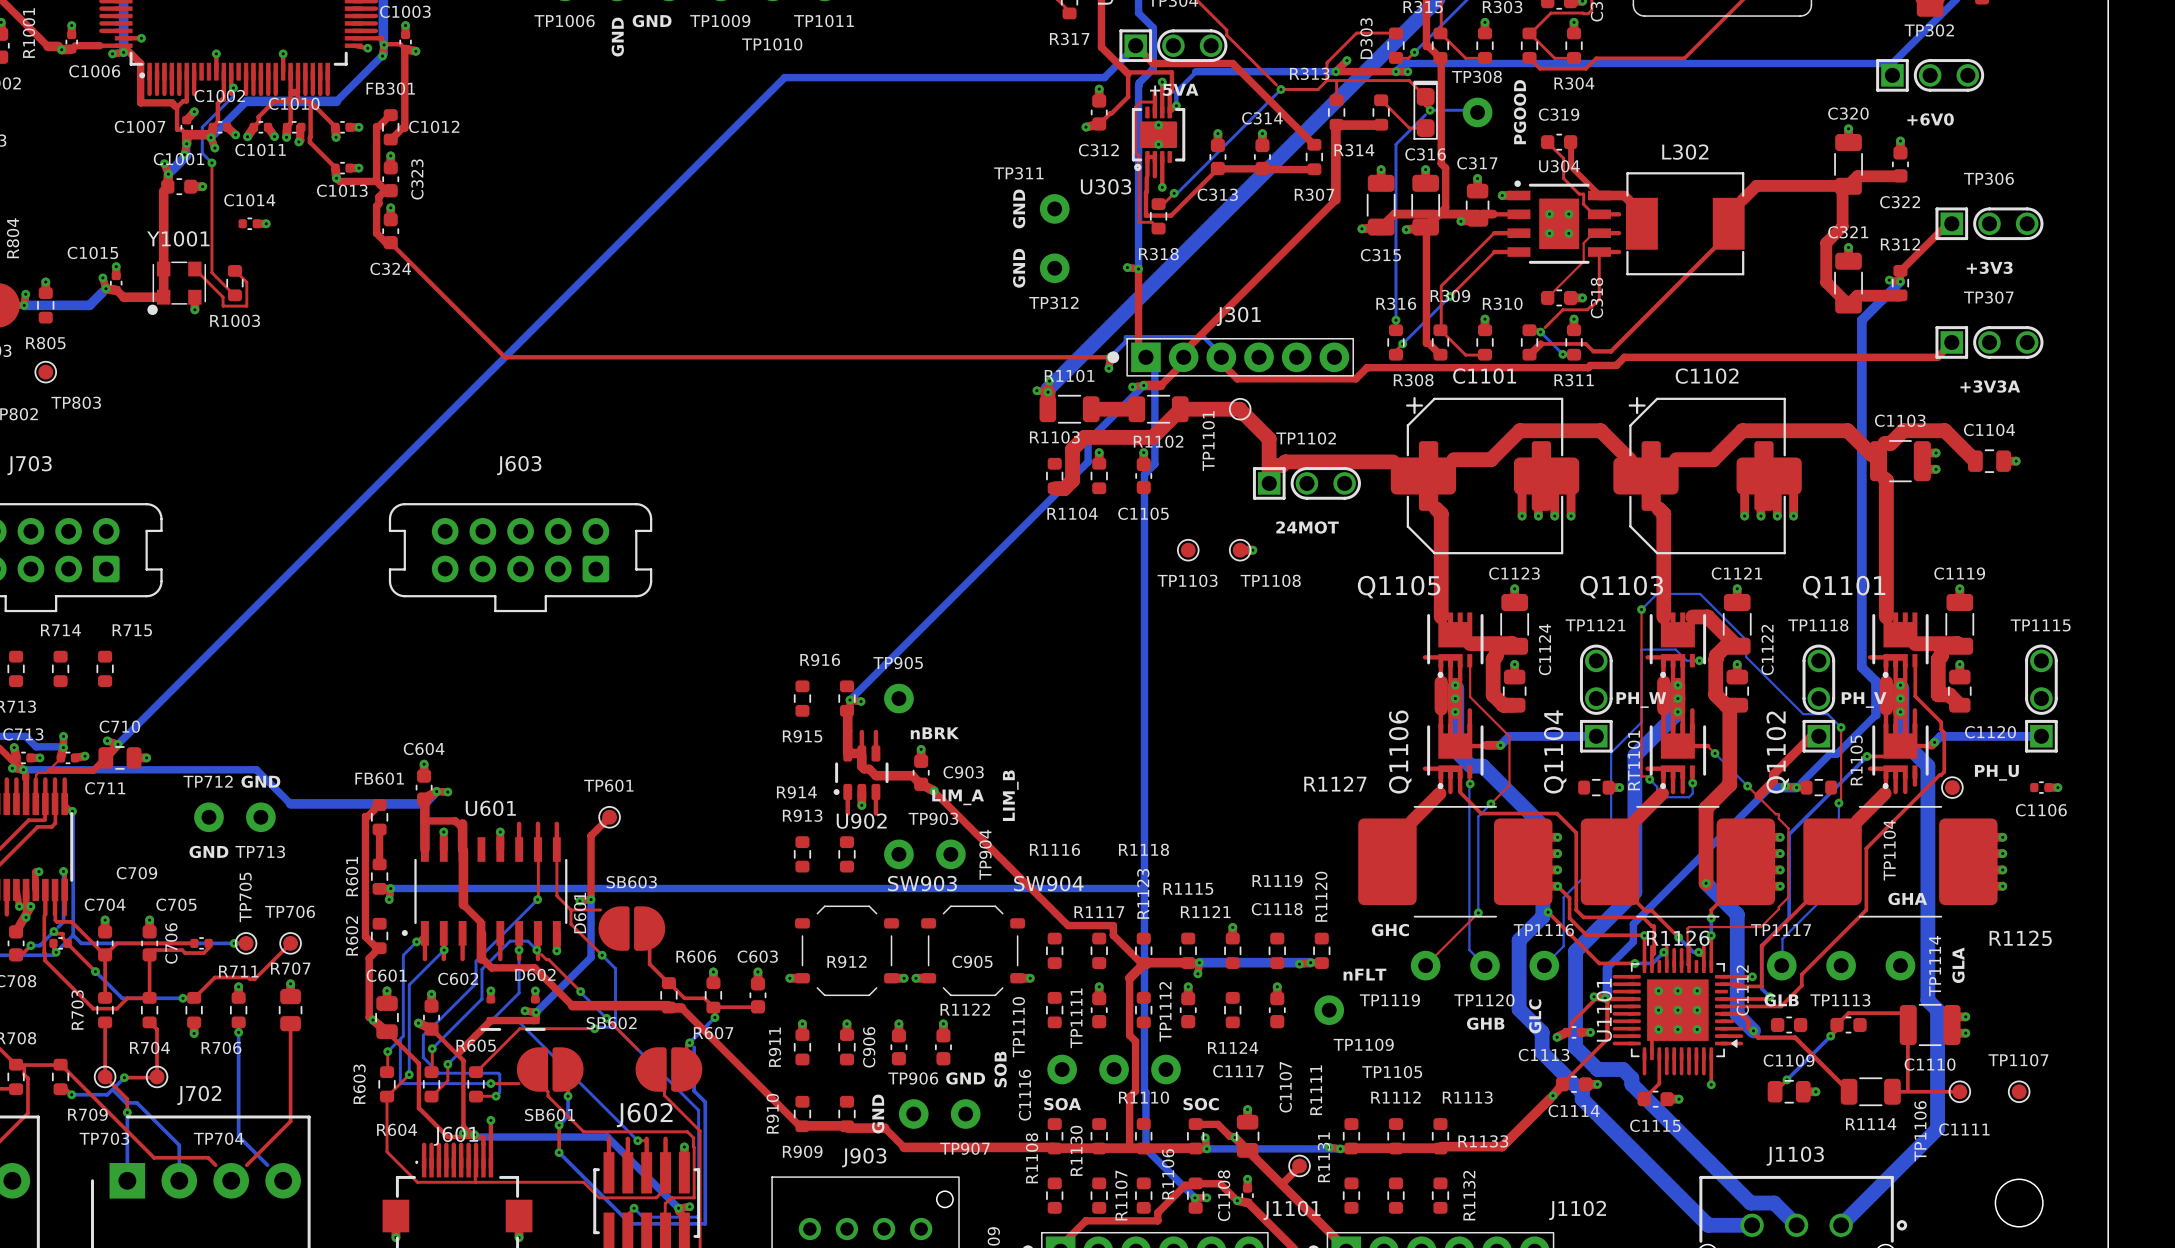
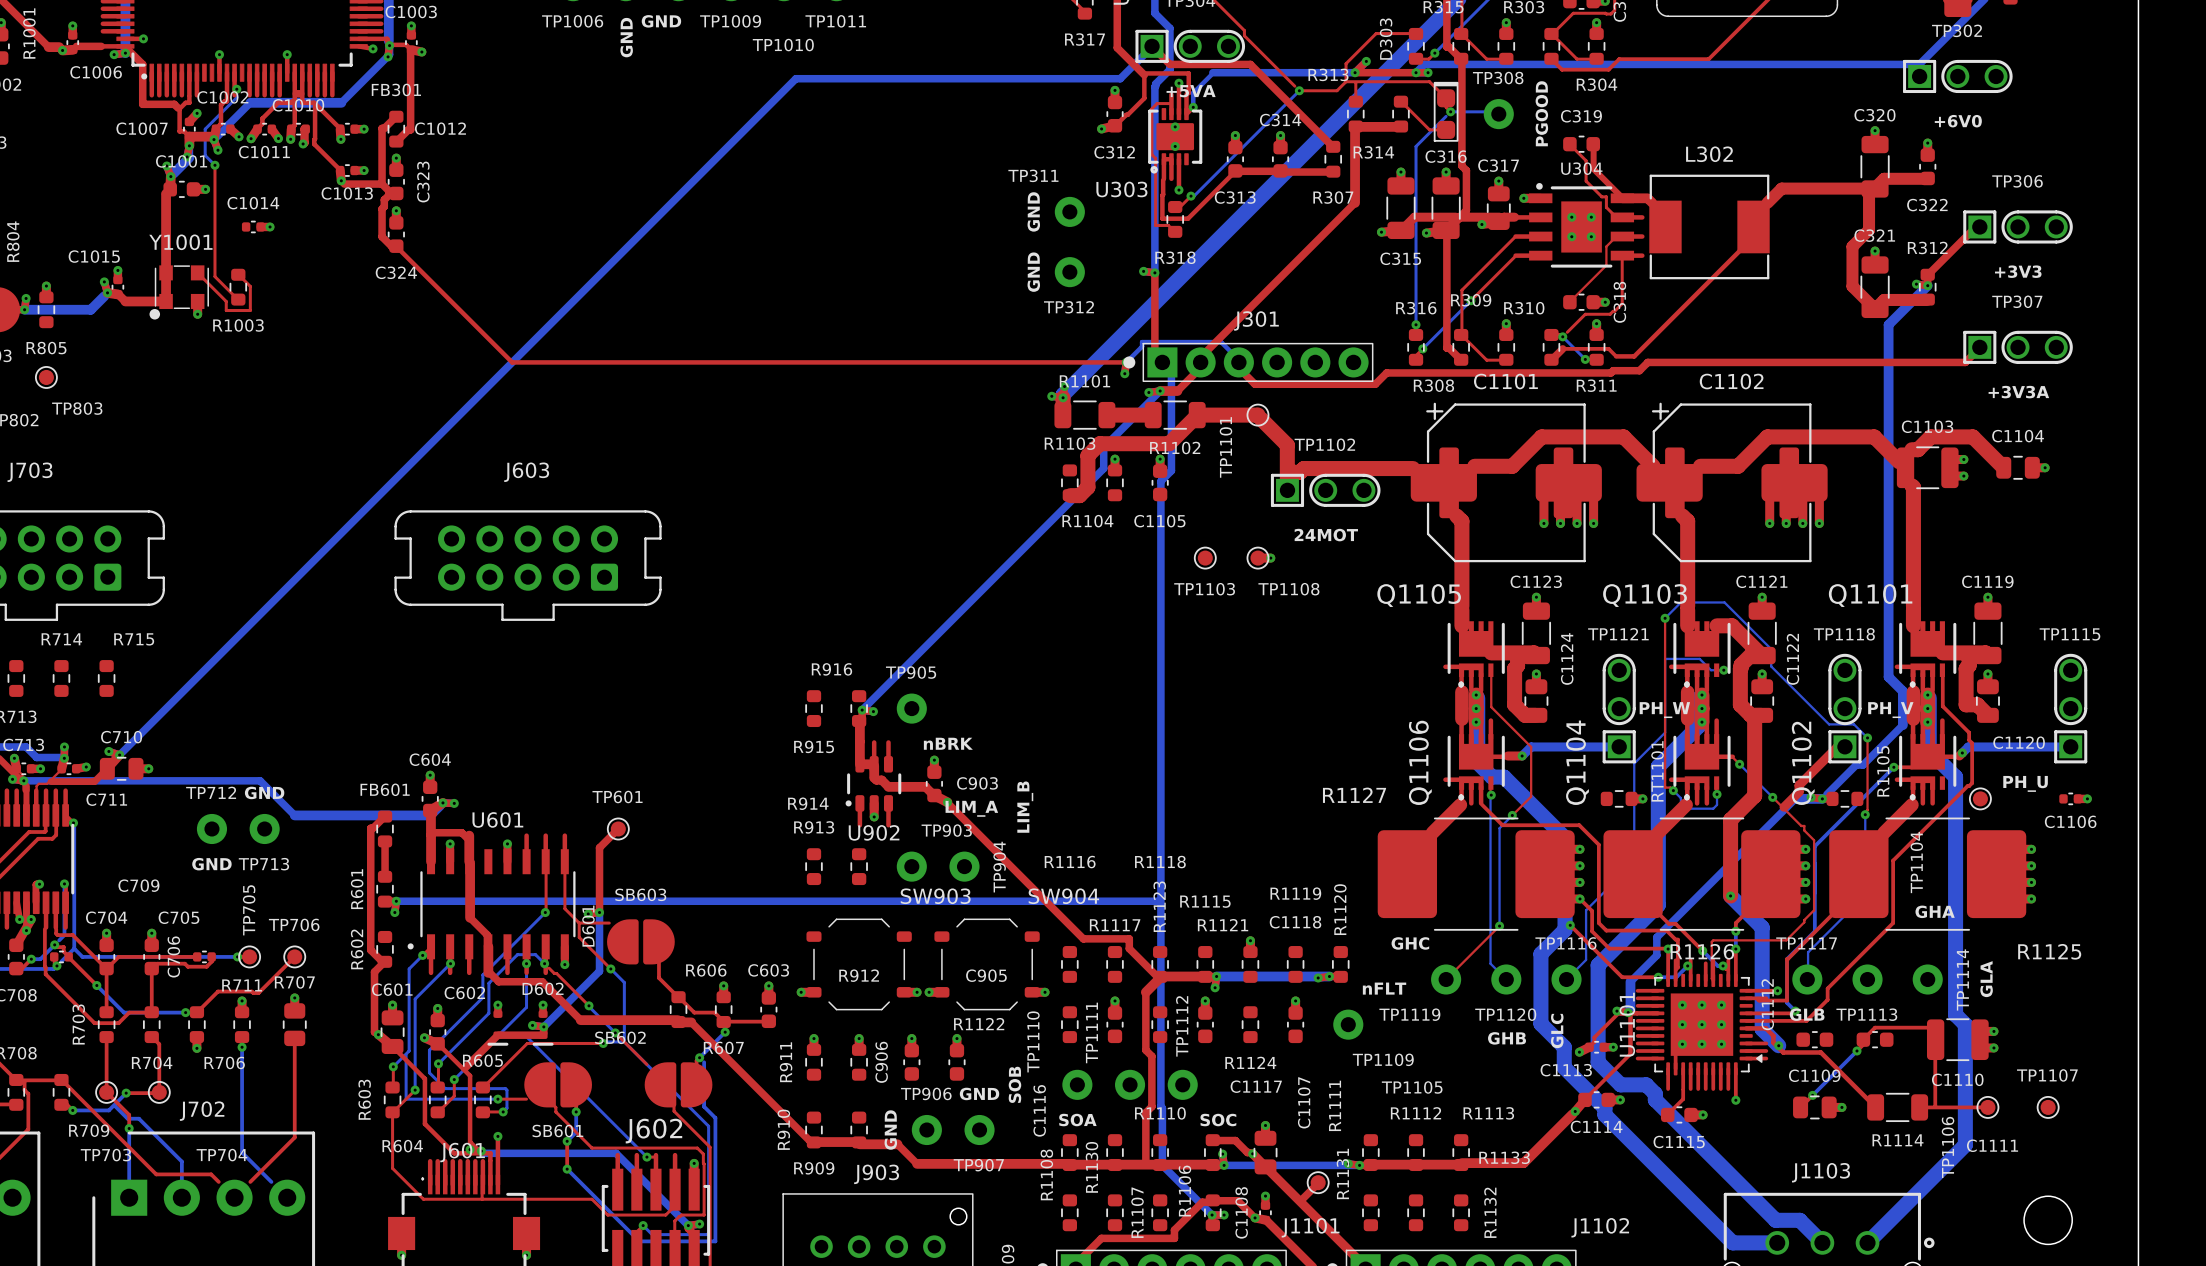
top track: (1914, 772) (1914, 784) -> none
top track: (1674, 949) (1674, 966) -> none
top track: (1721, 1021) (1732, 1021) -> none

